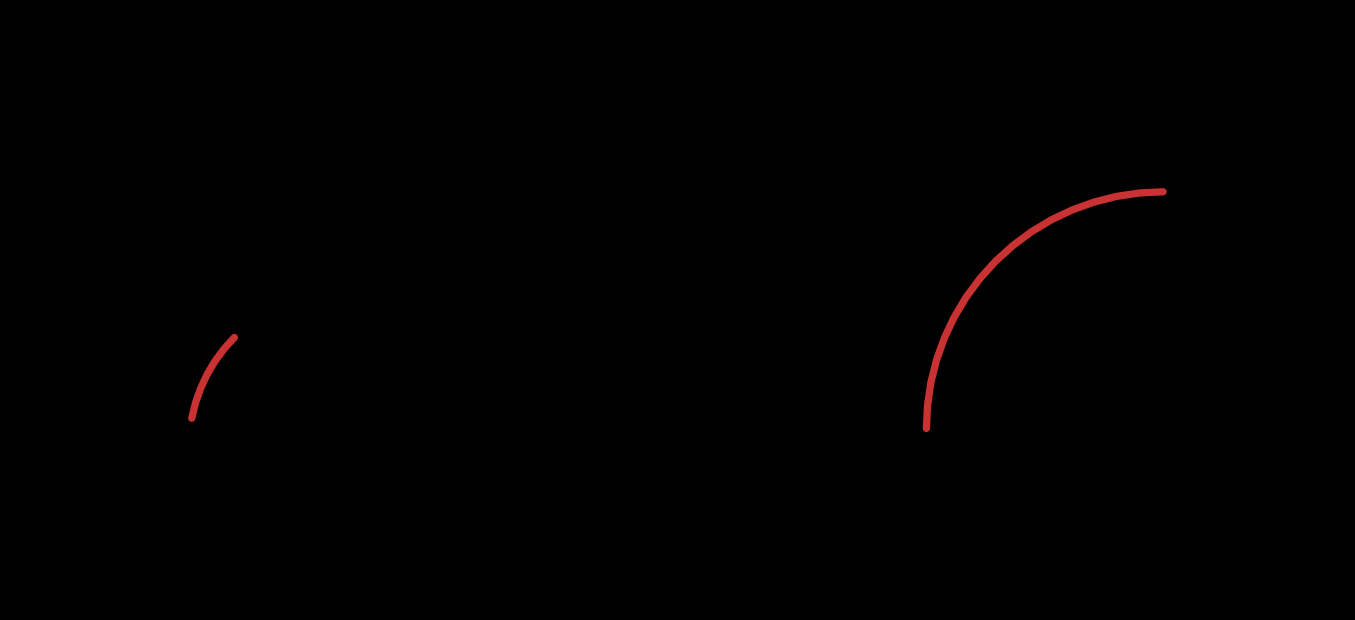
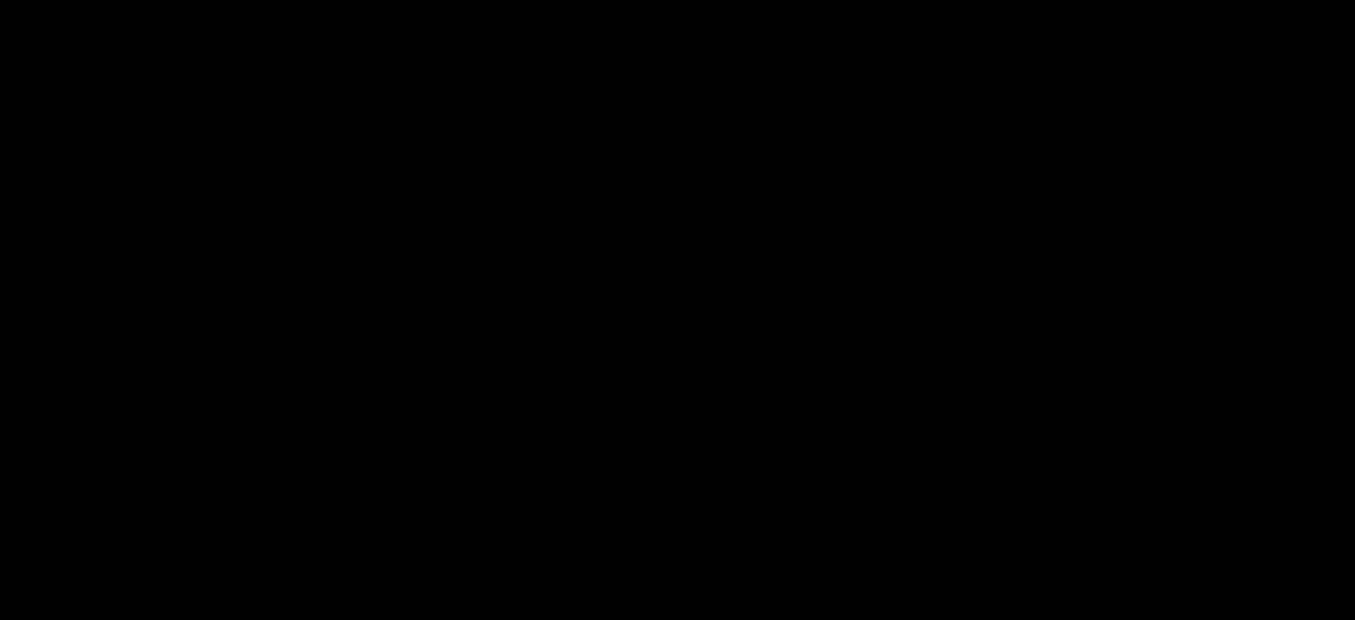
top track: (1163, 191) (1116, 196) (1072, 209) (1031, 231) (995, 261) (966, 296) (944, 337) (930, 382) (926, 428) -> none
top track: (234, 337) (214, 361) (206, 374) (195, 403) (191, 418) -> none

